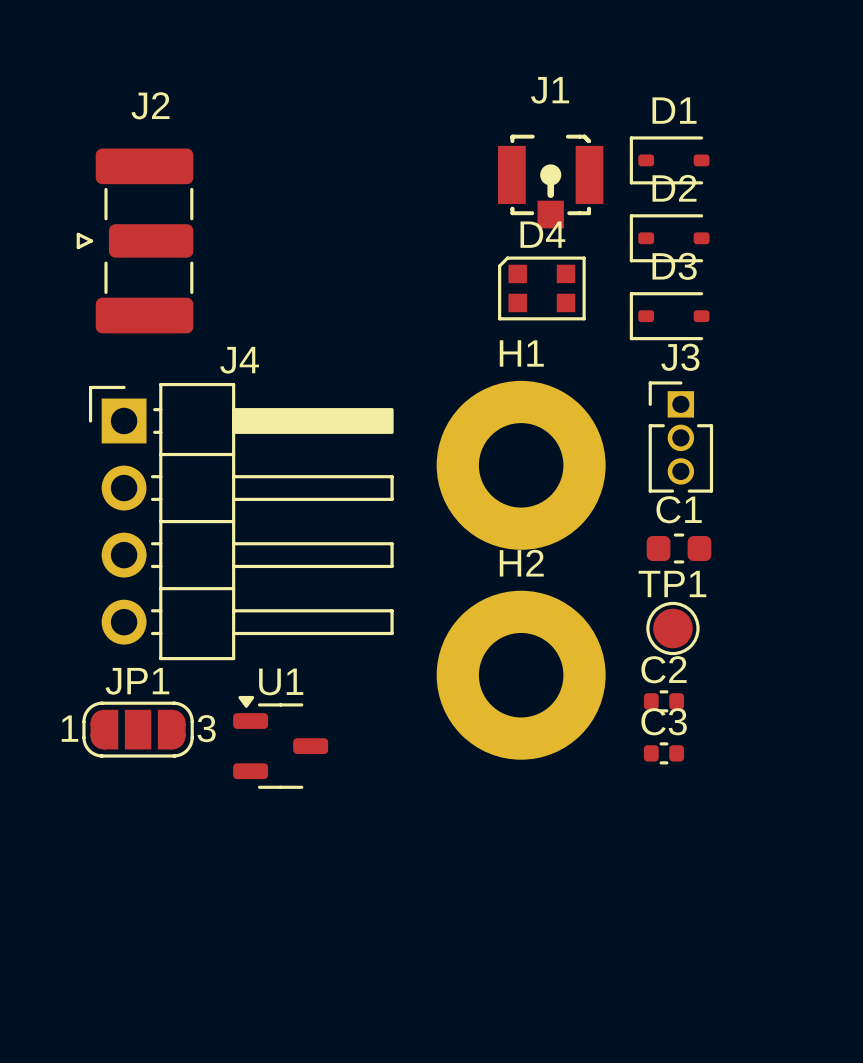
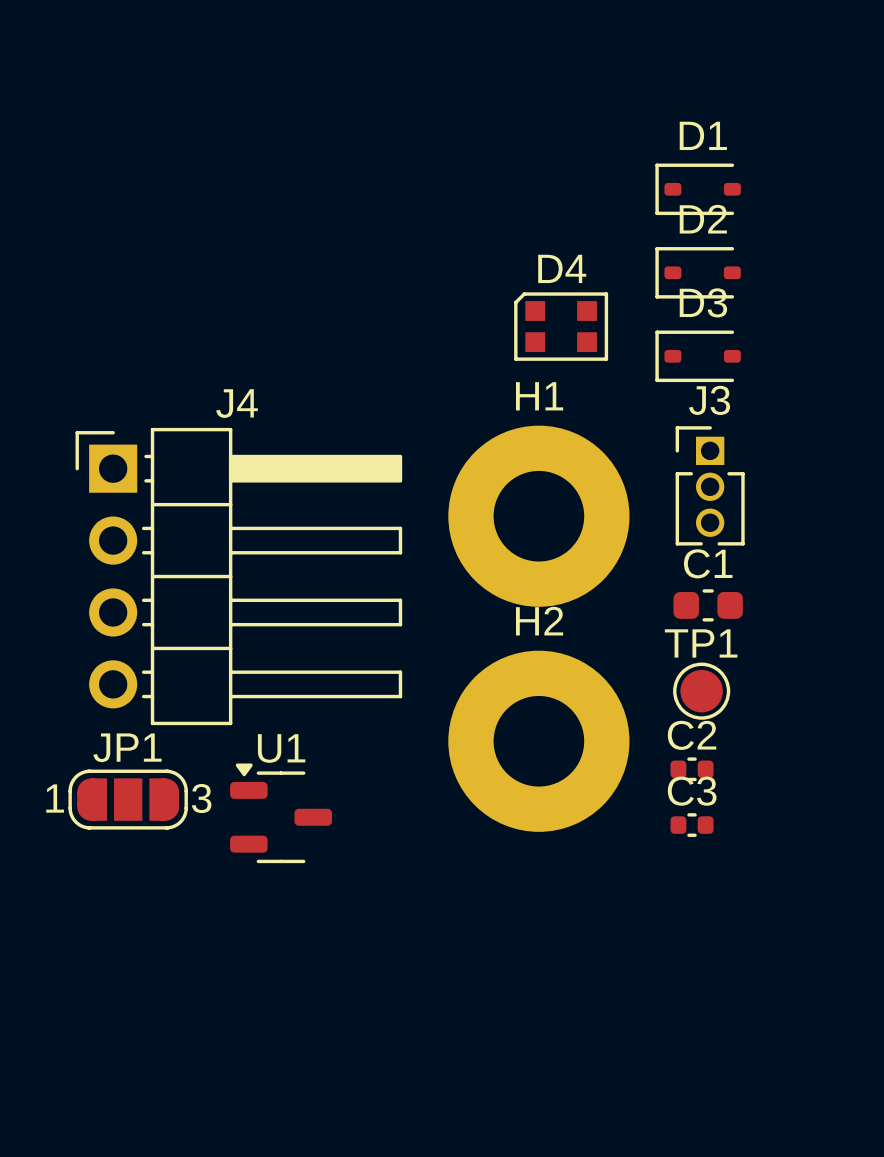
J1: (550, 181) -> none
J2: (135, 240) -> none

